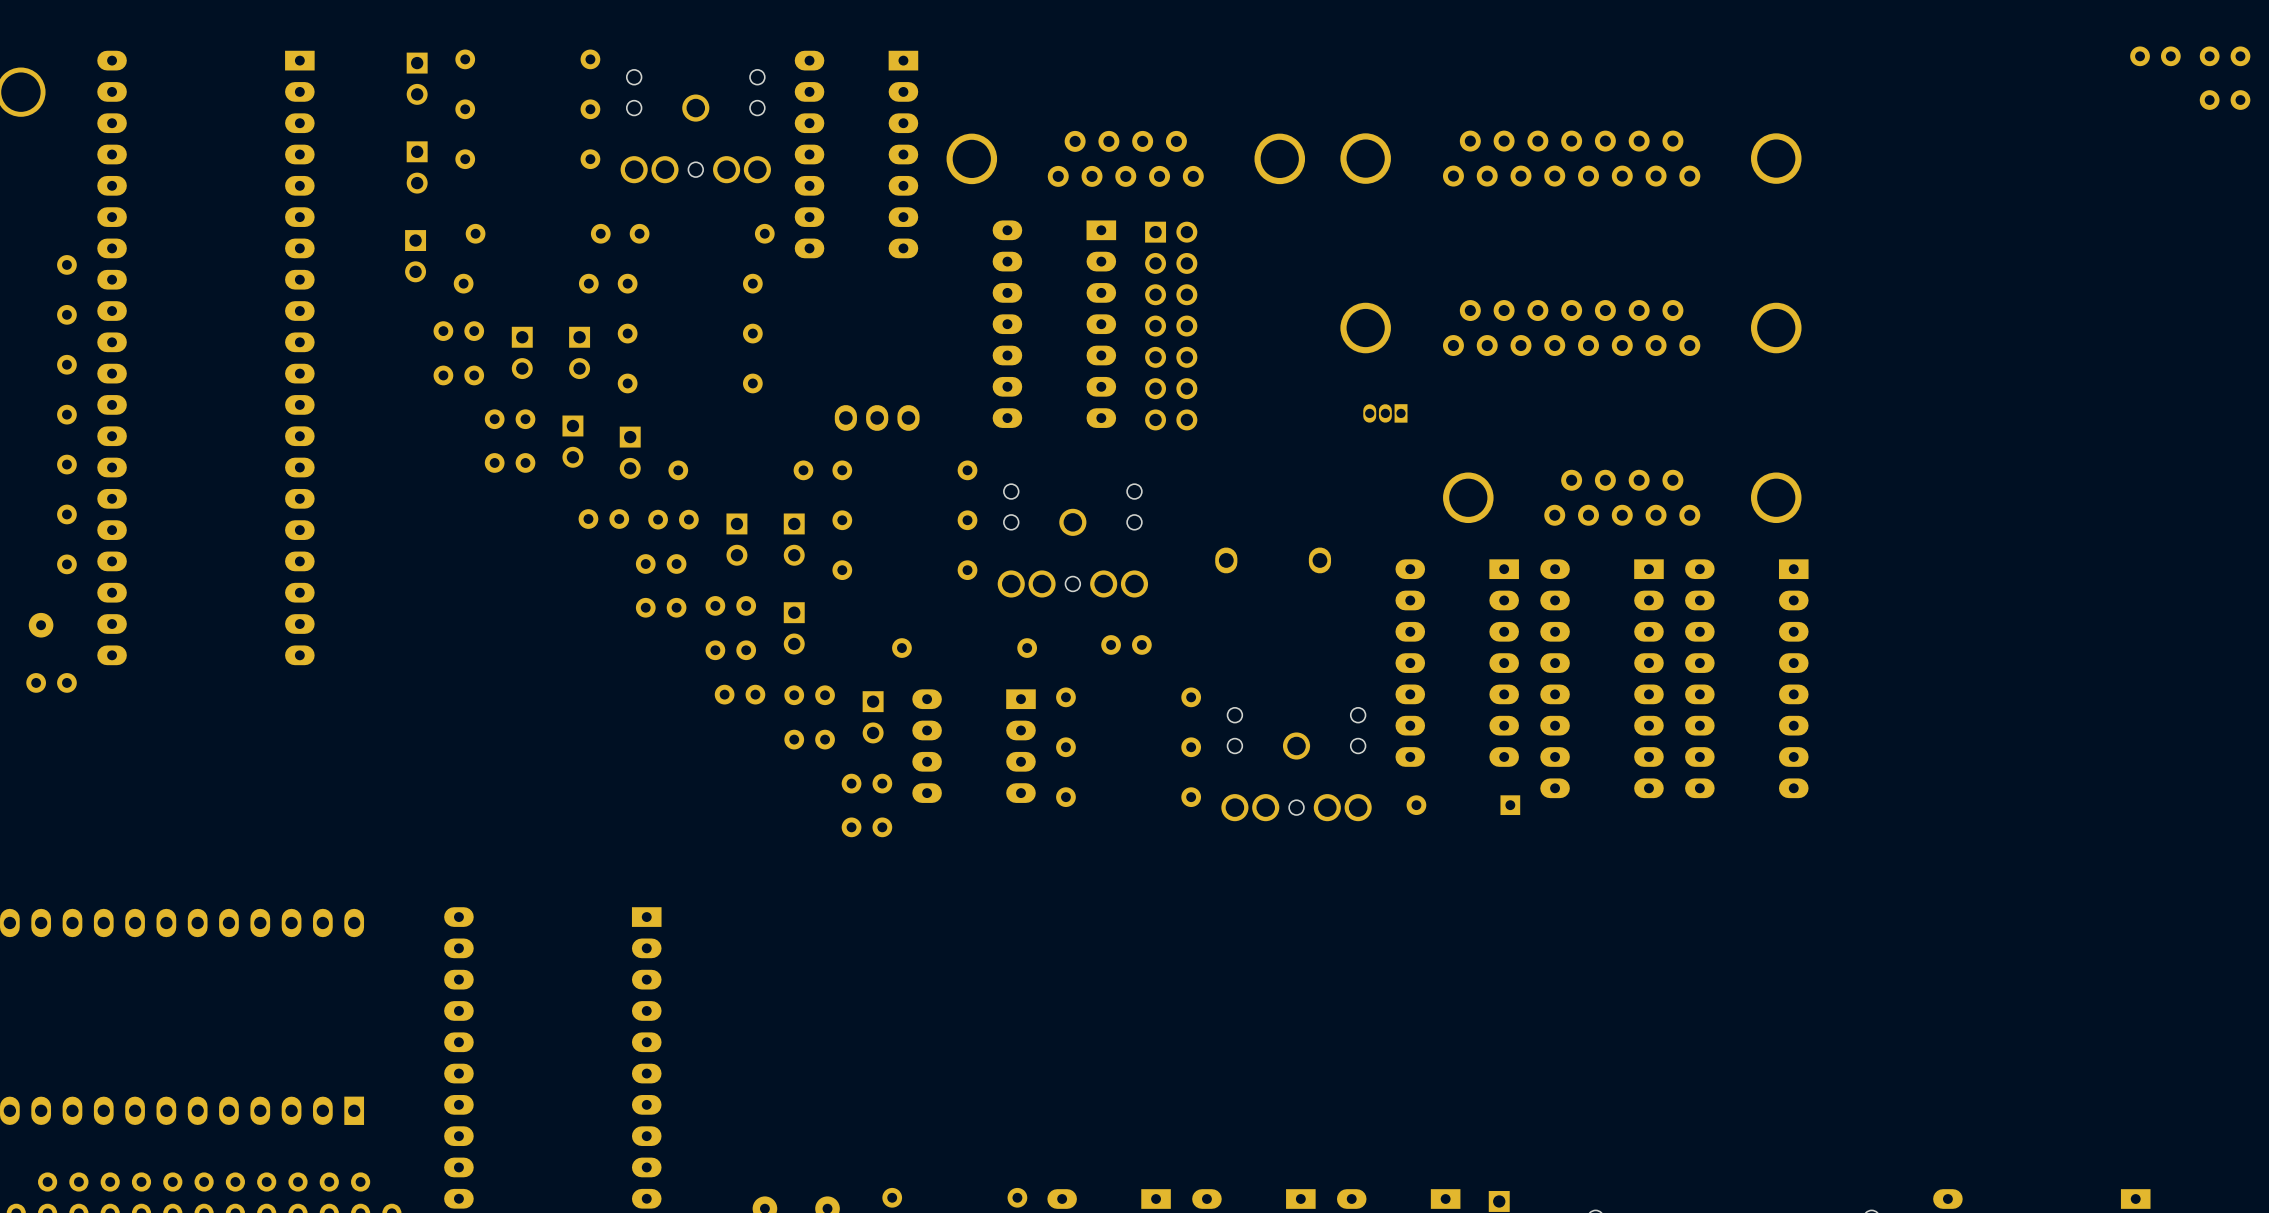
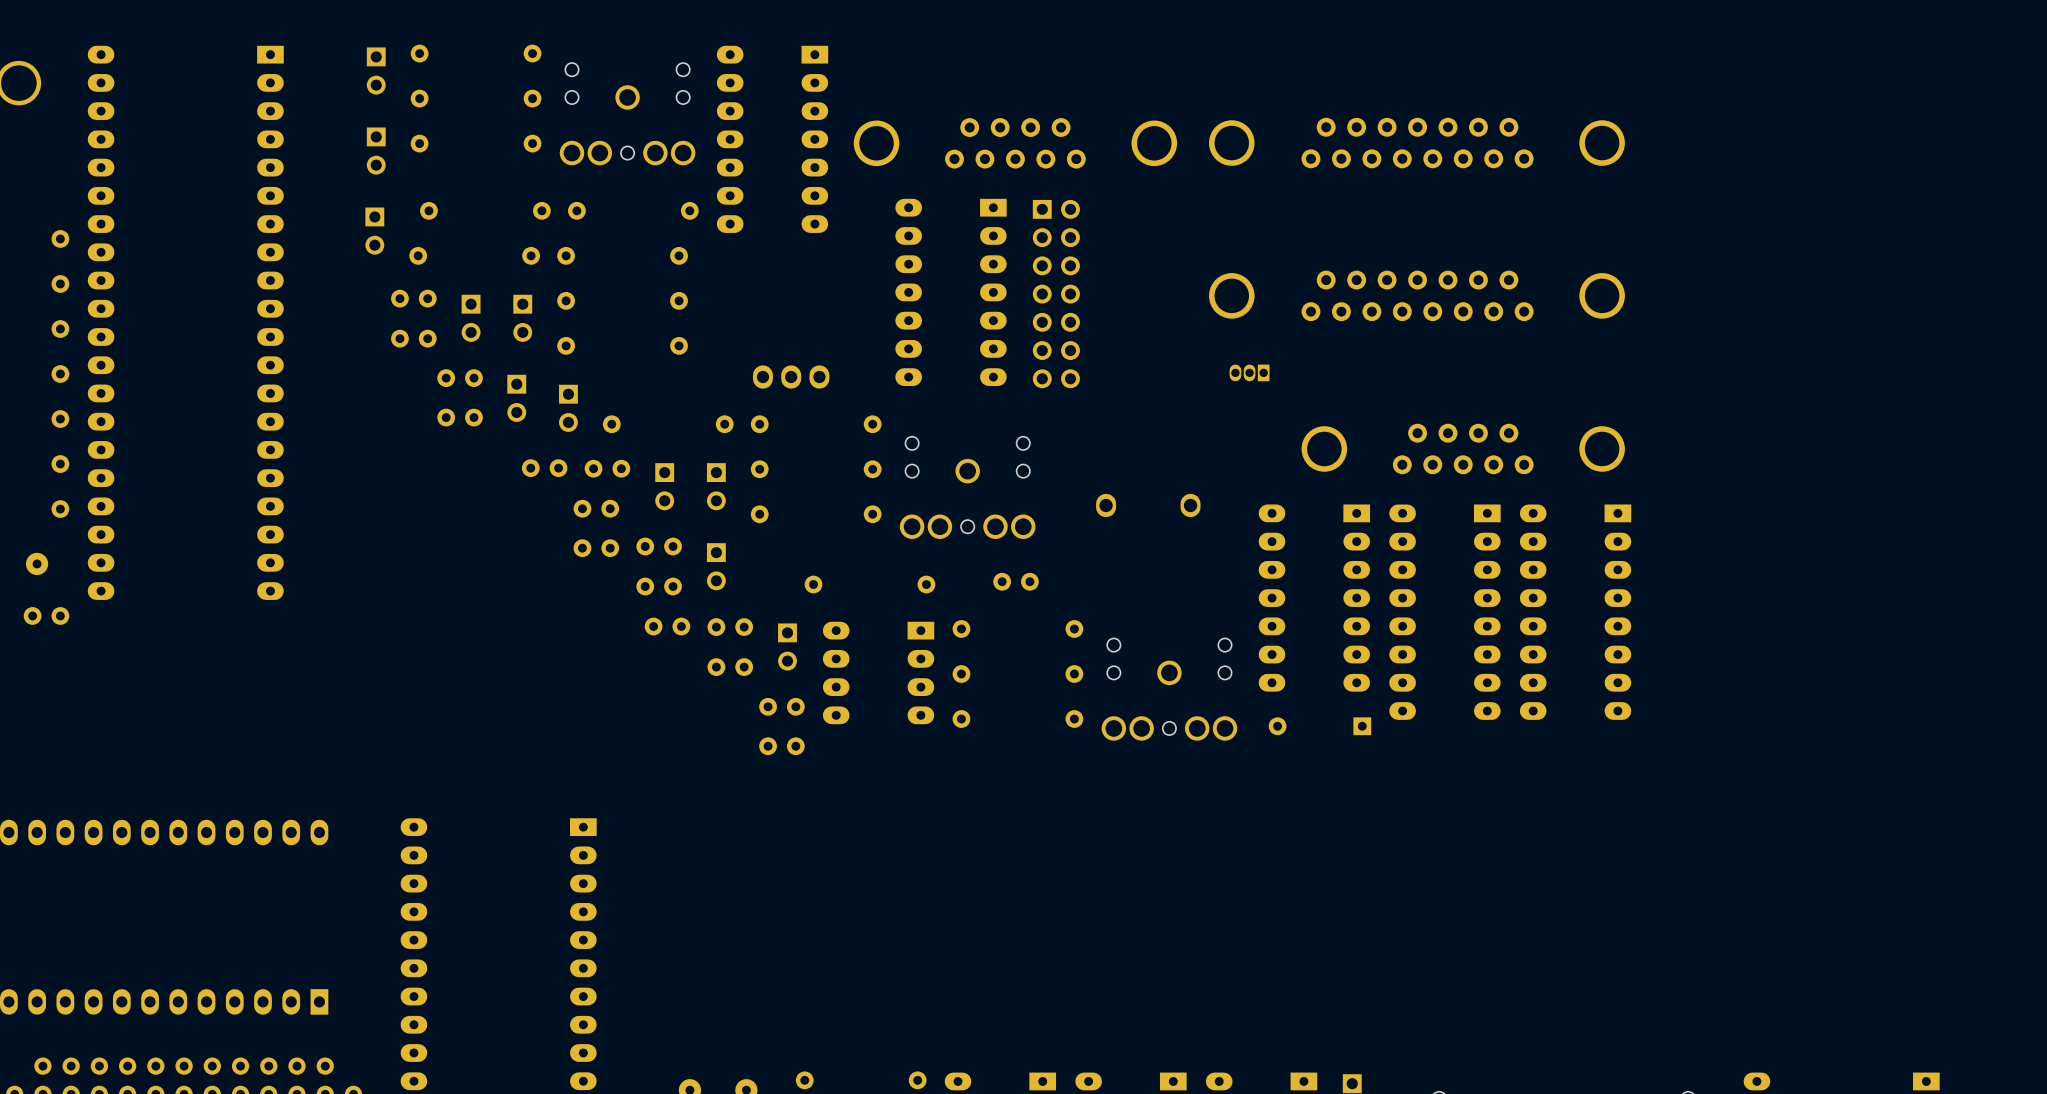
part: (2155, 56) -> none
part: (2225, 56) -> none
part: (2225, 100) -> none

